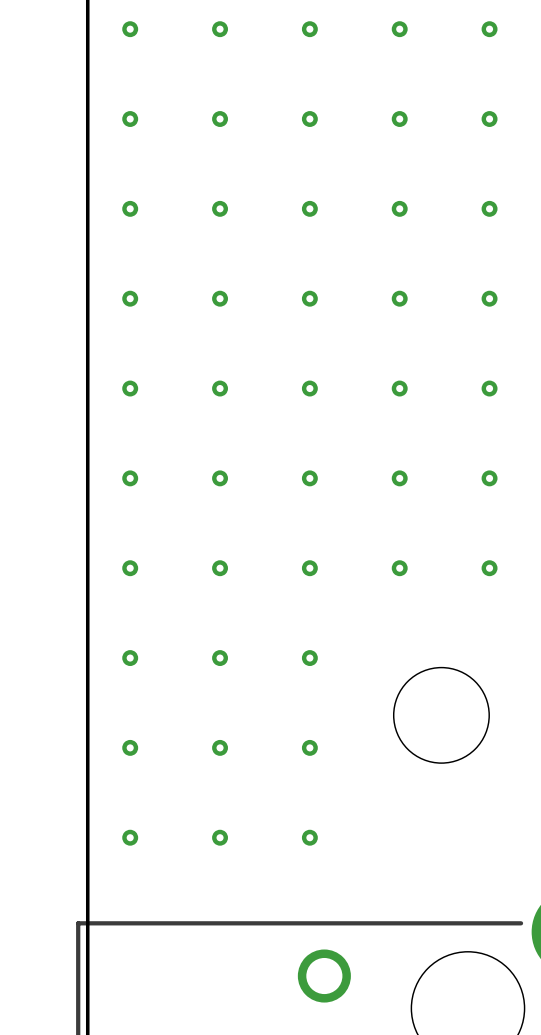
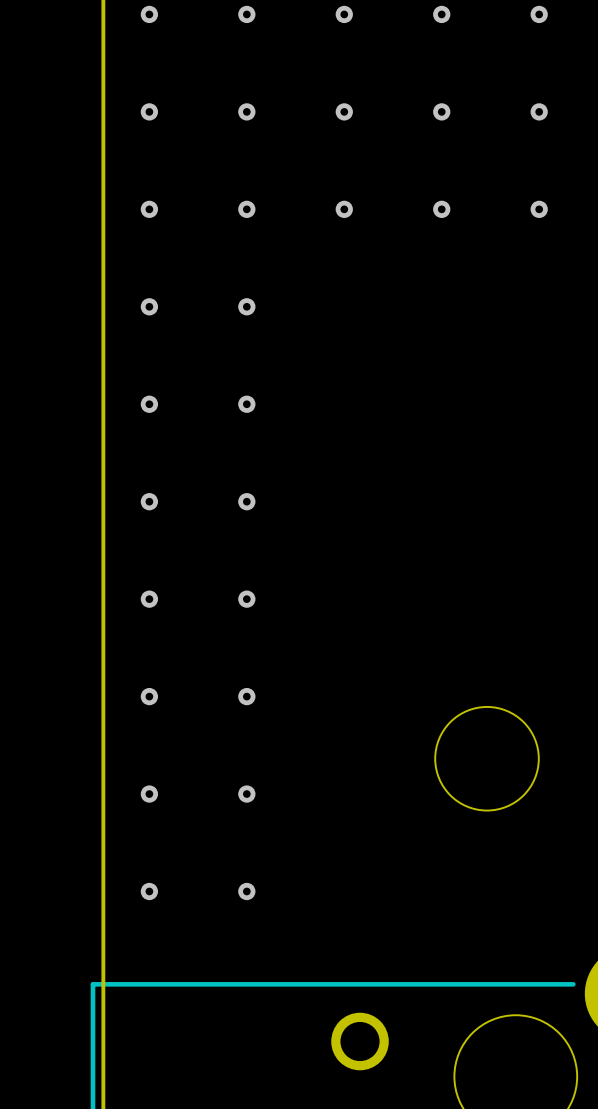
via: (309, 298) -> none
via: (399, 298) -> none
via: (489, 298) -> none
via: (309, 388) -> none
via: (399, 388) -> none
via: (489, 388) -> none
via: (309, 478) -> none
via: (399, 478) -> none
via: (489, 478) -> none
via: (309, 568) -> none
via: (399, 568) -> none
via: (489, 568) -> none
via: (309, 658) -> none
via: (309, 747) -> none
via: (309, 837) -> none

